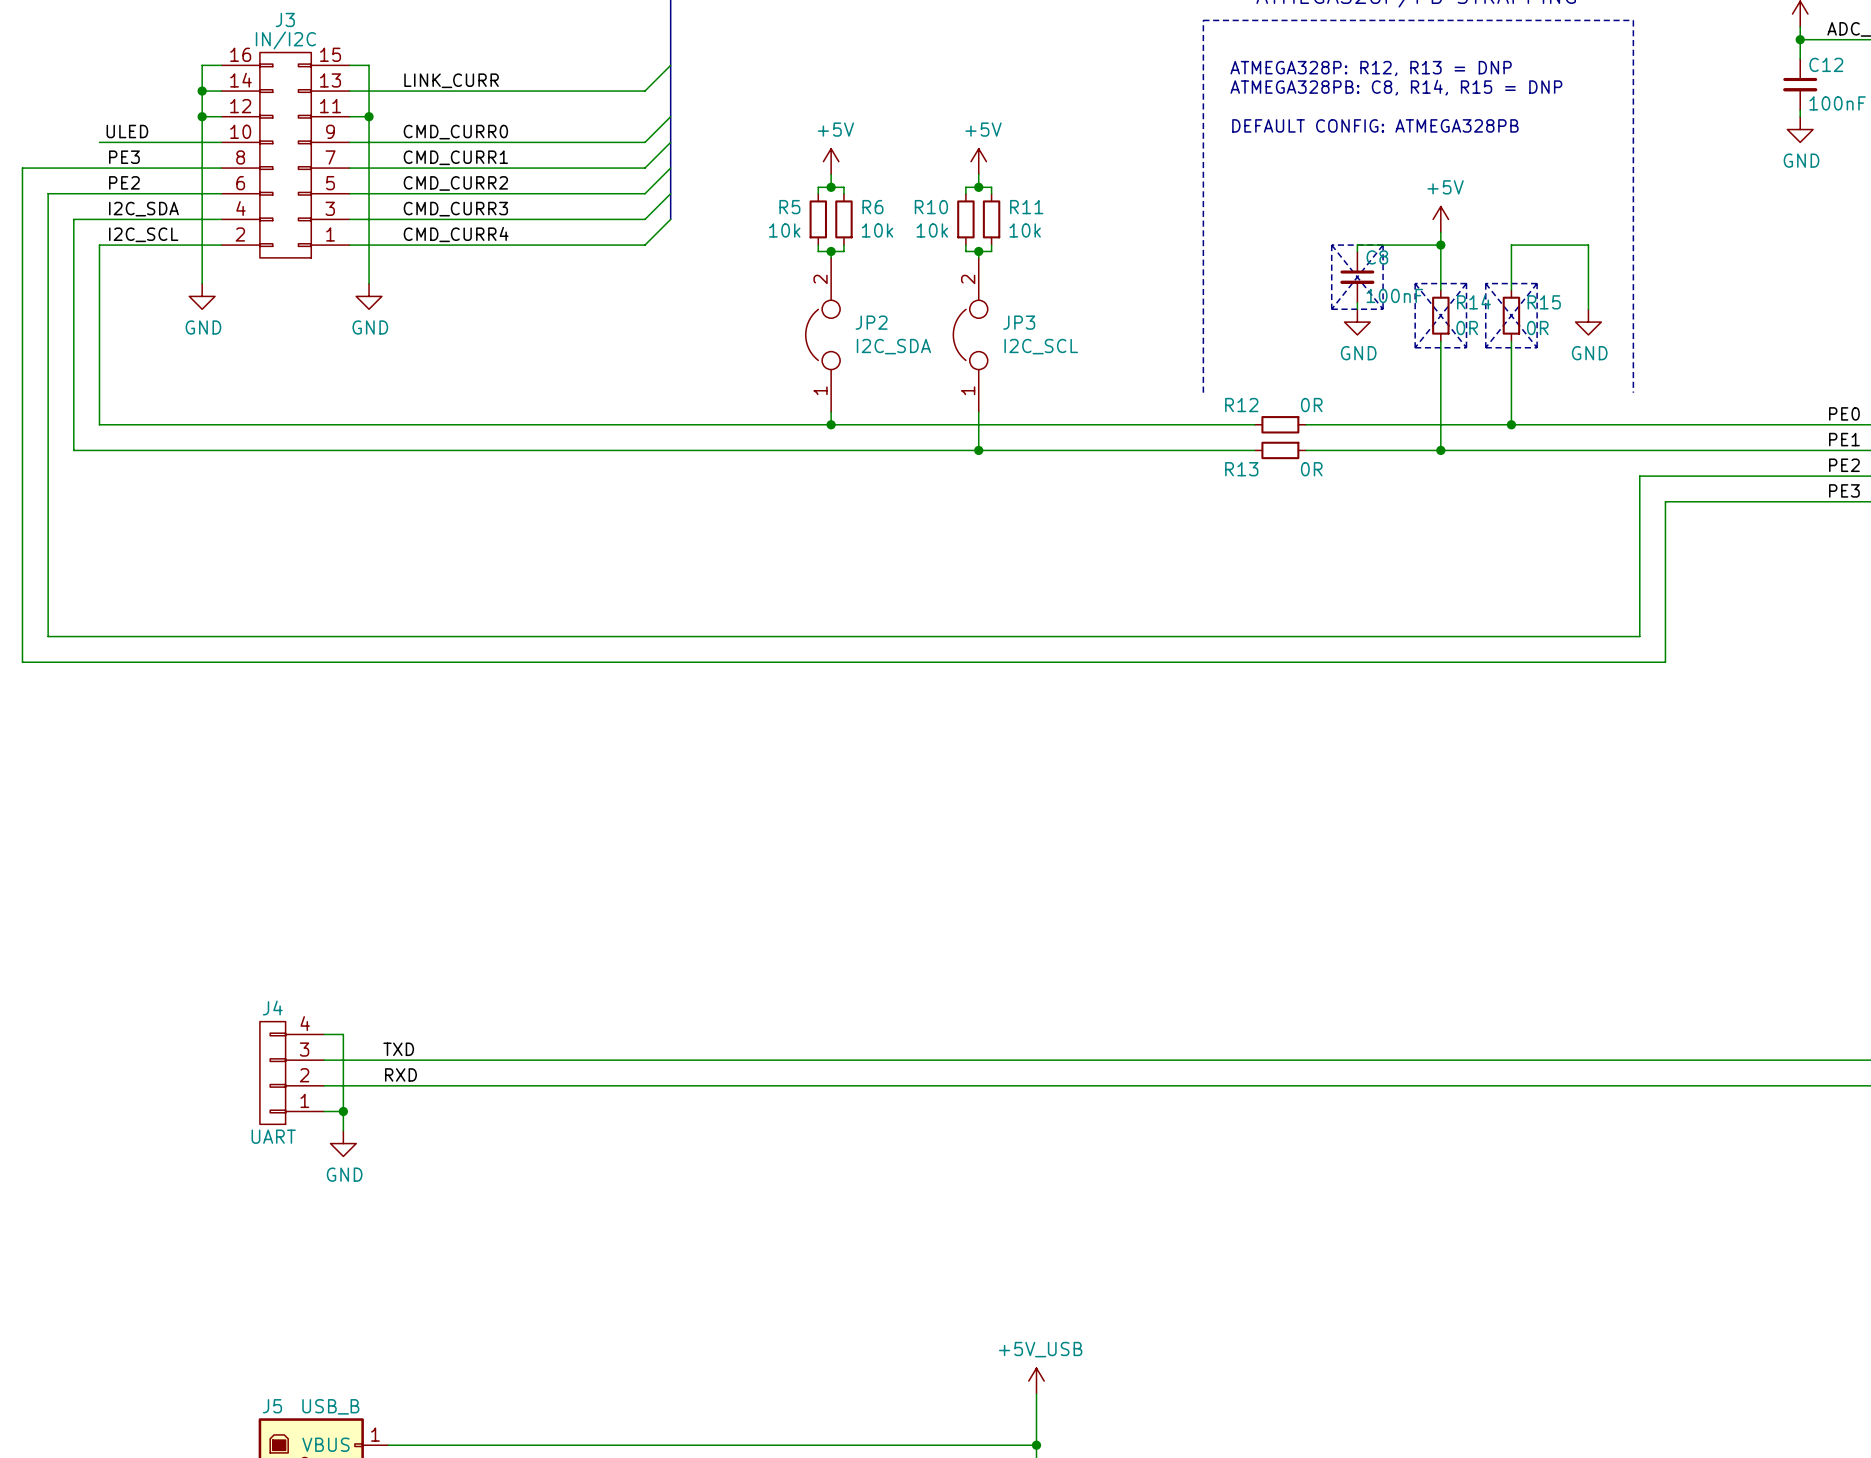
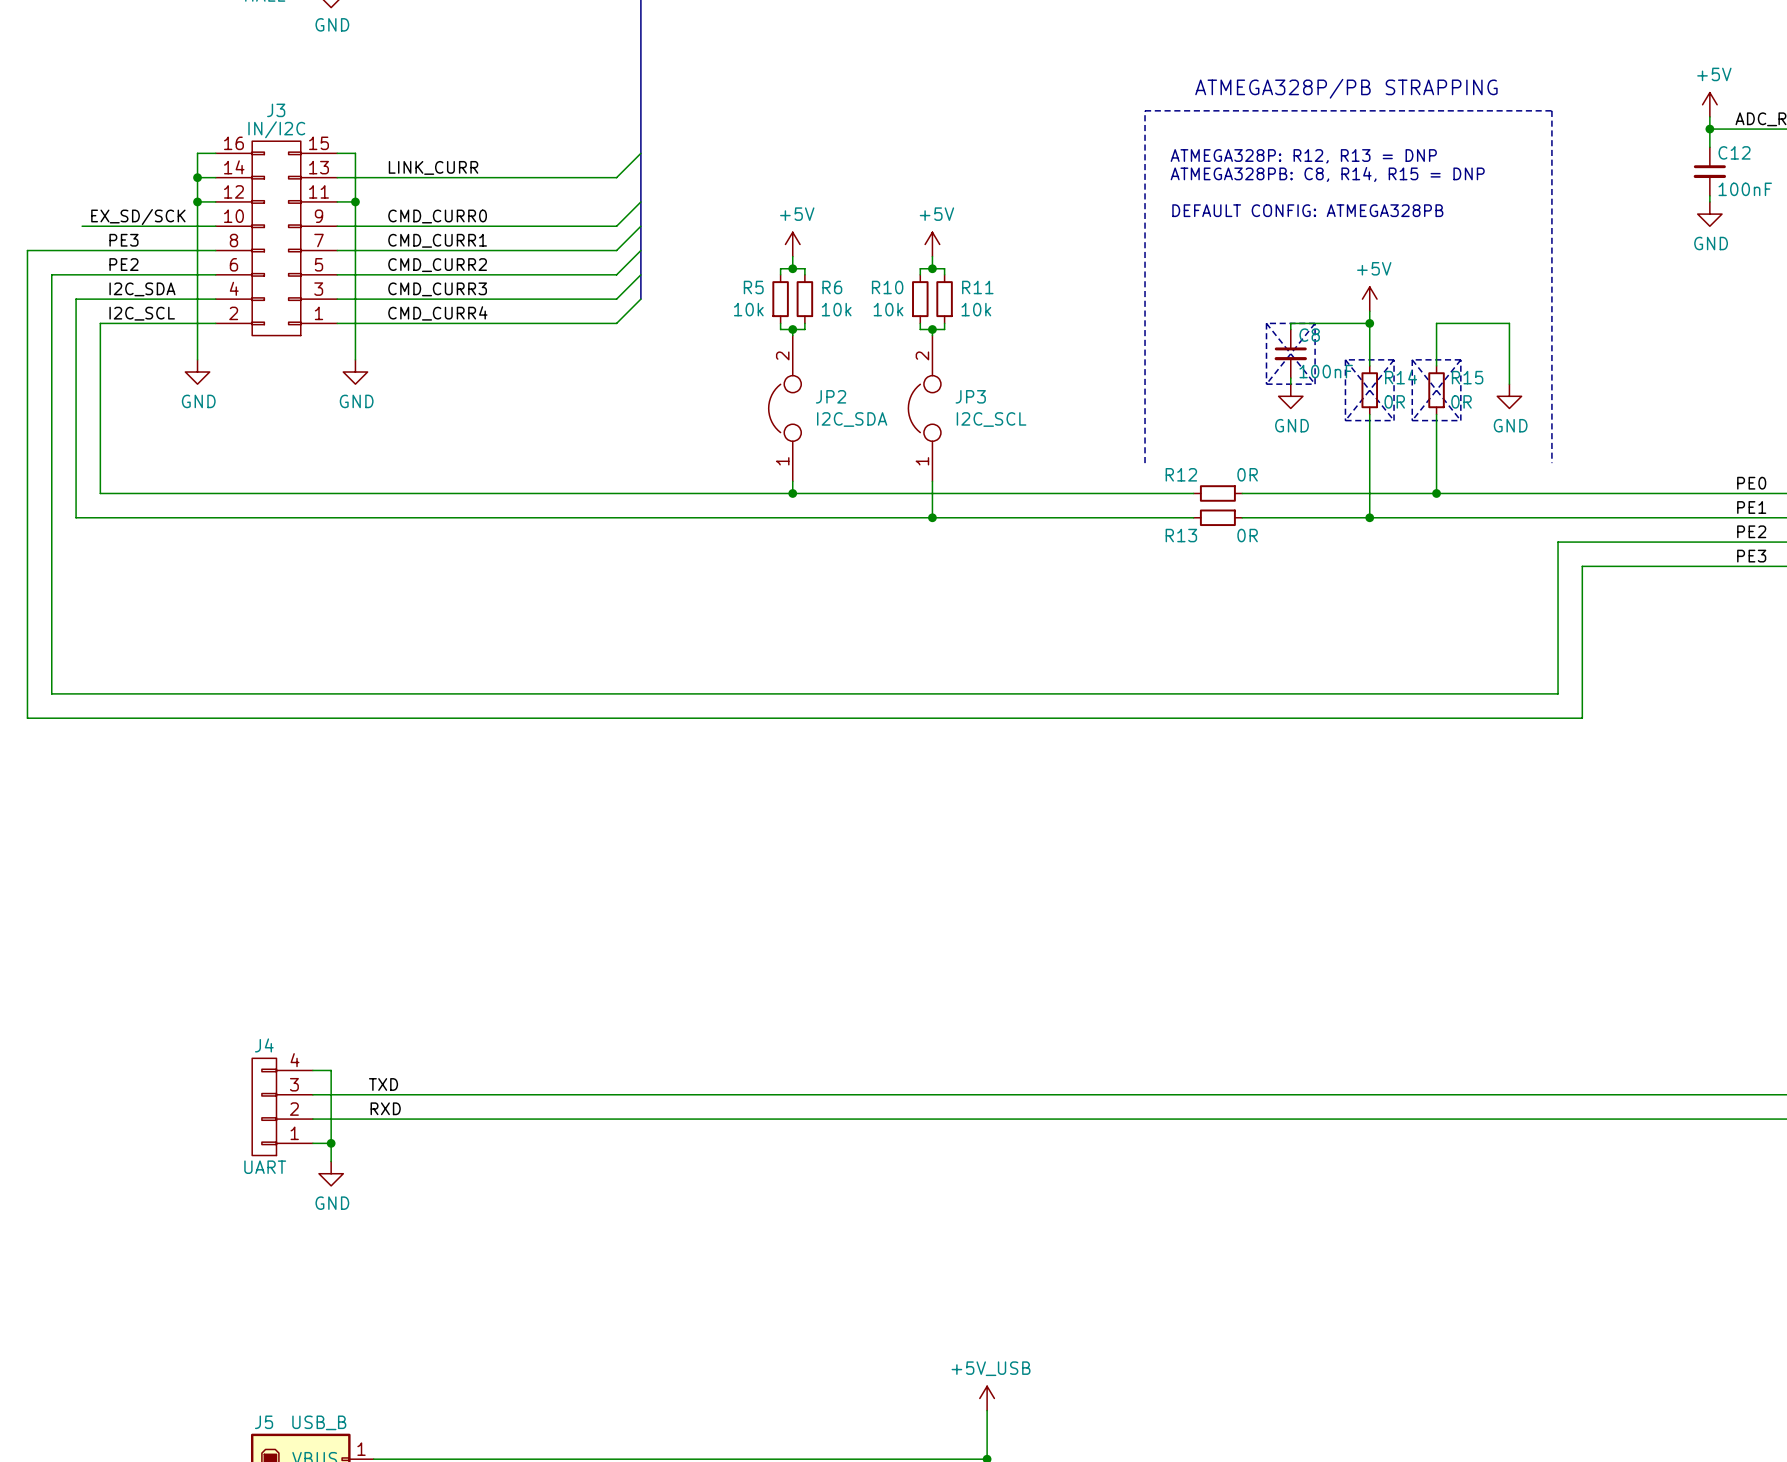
label: ULED (127, 131) -> none
label: none -> EX_SD/SCK (138, 217)
wire: none -> (82, 226) (100, 226)

